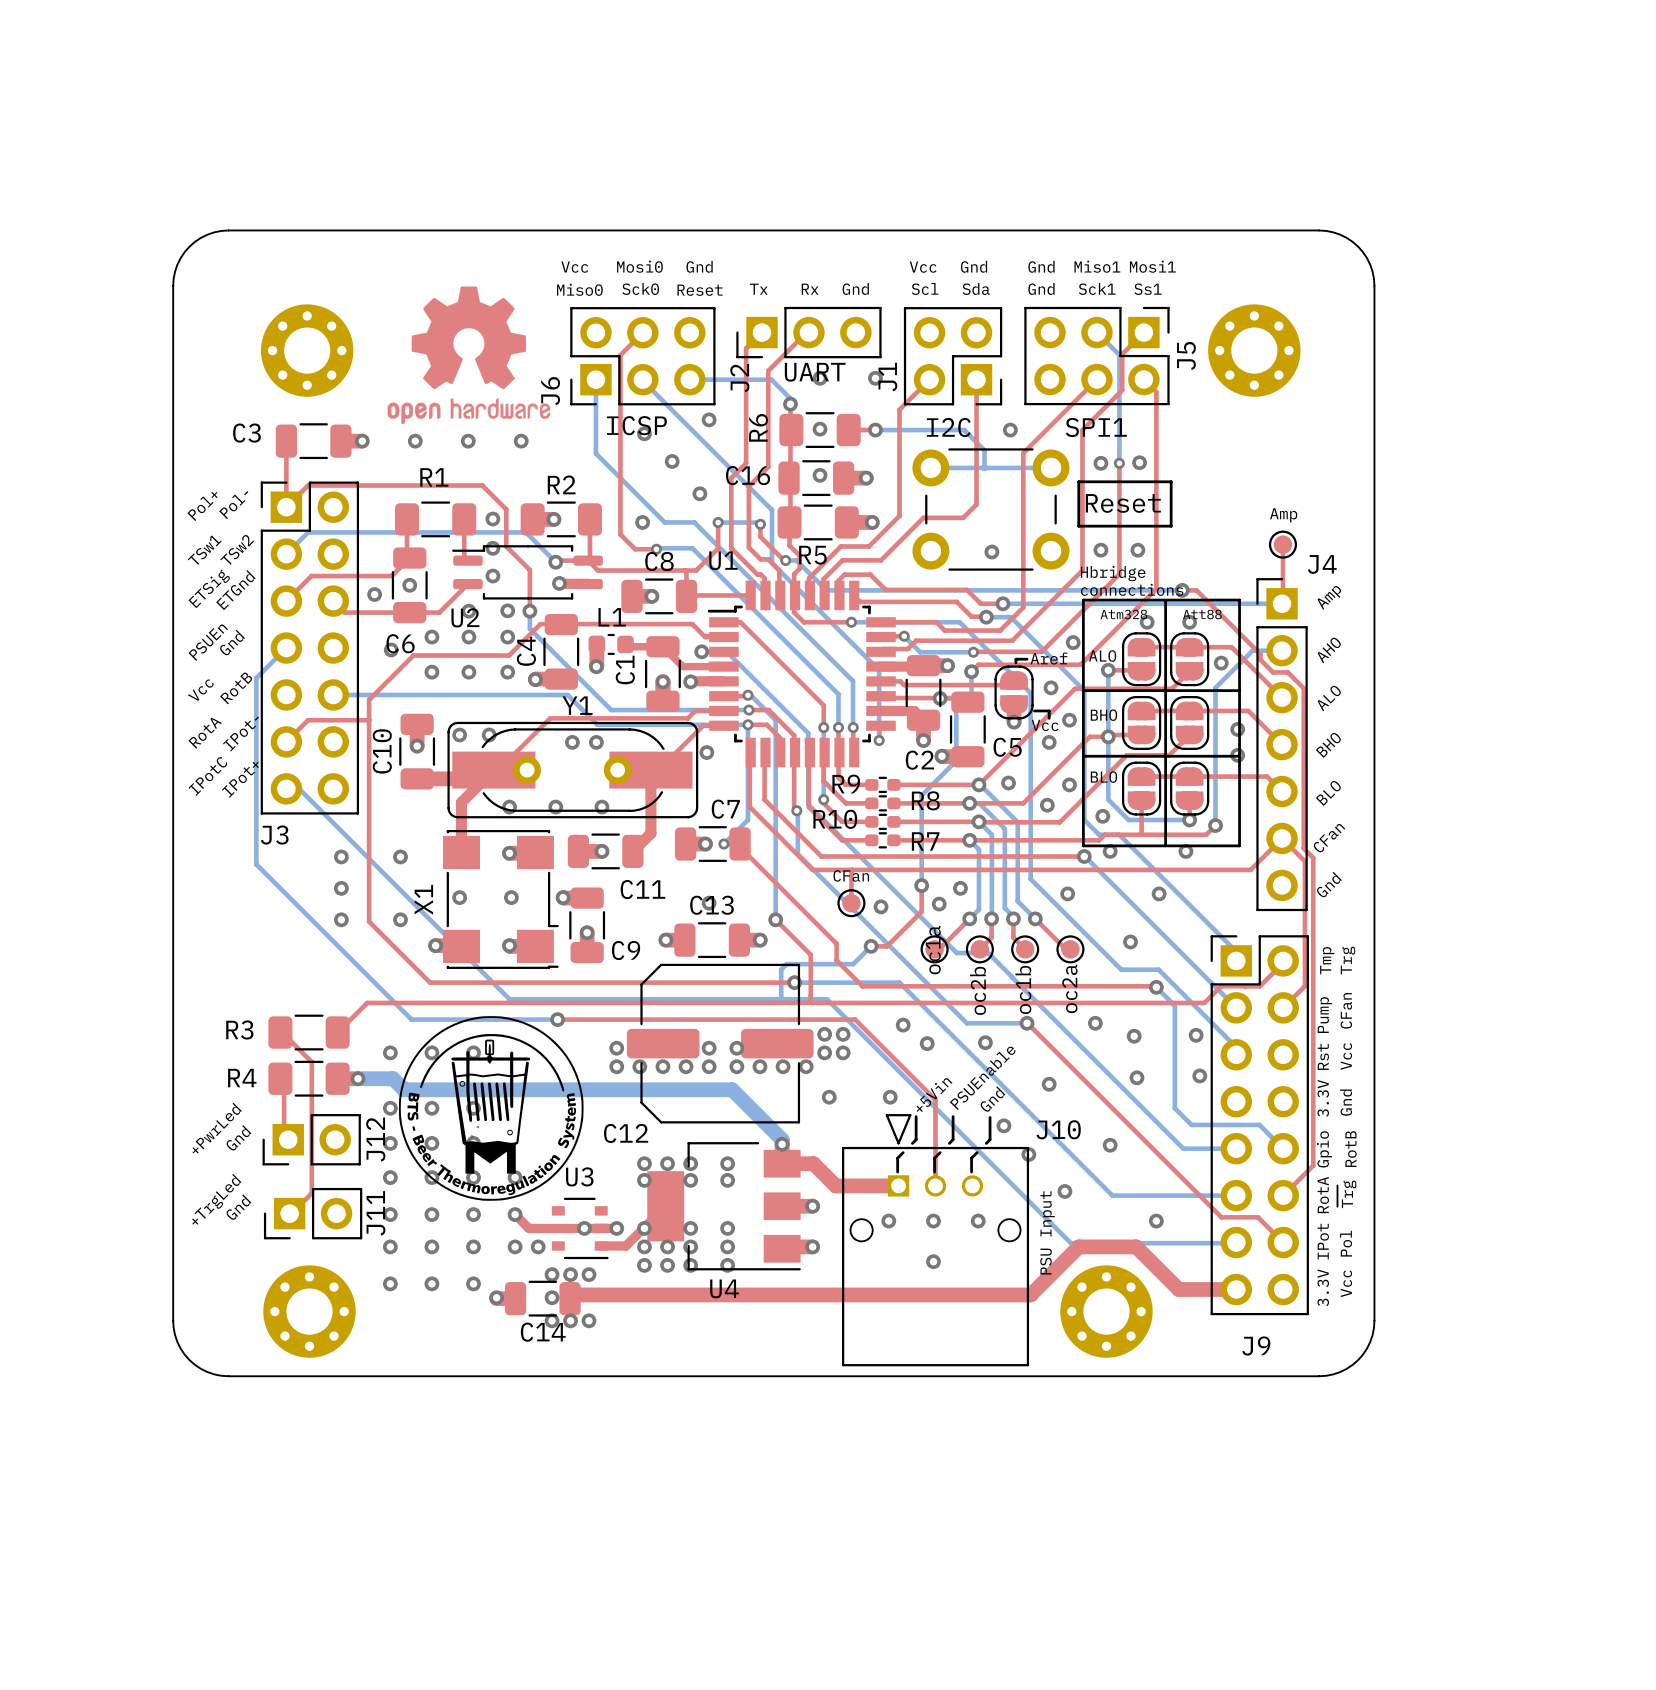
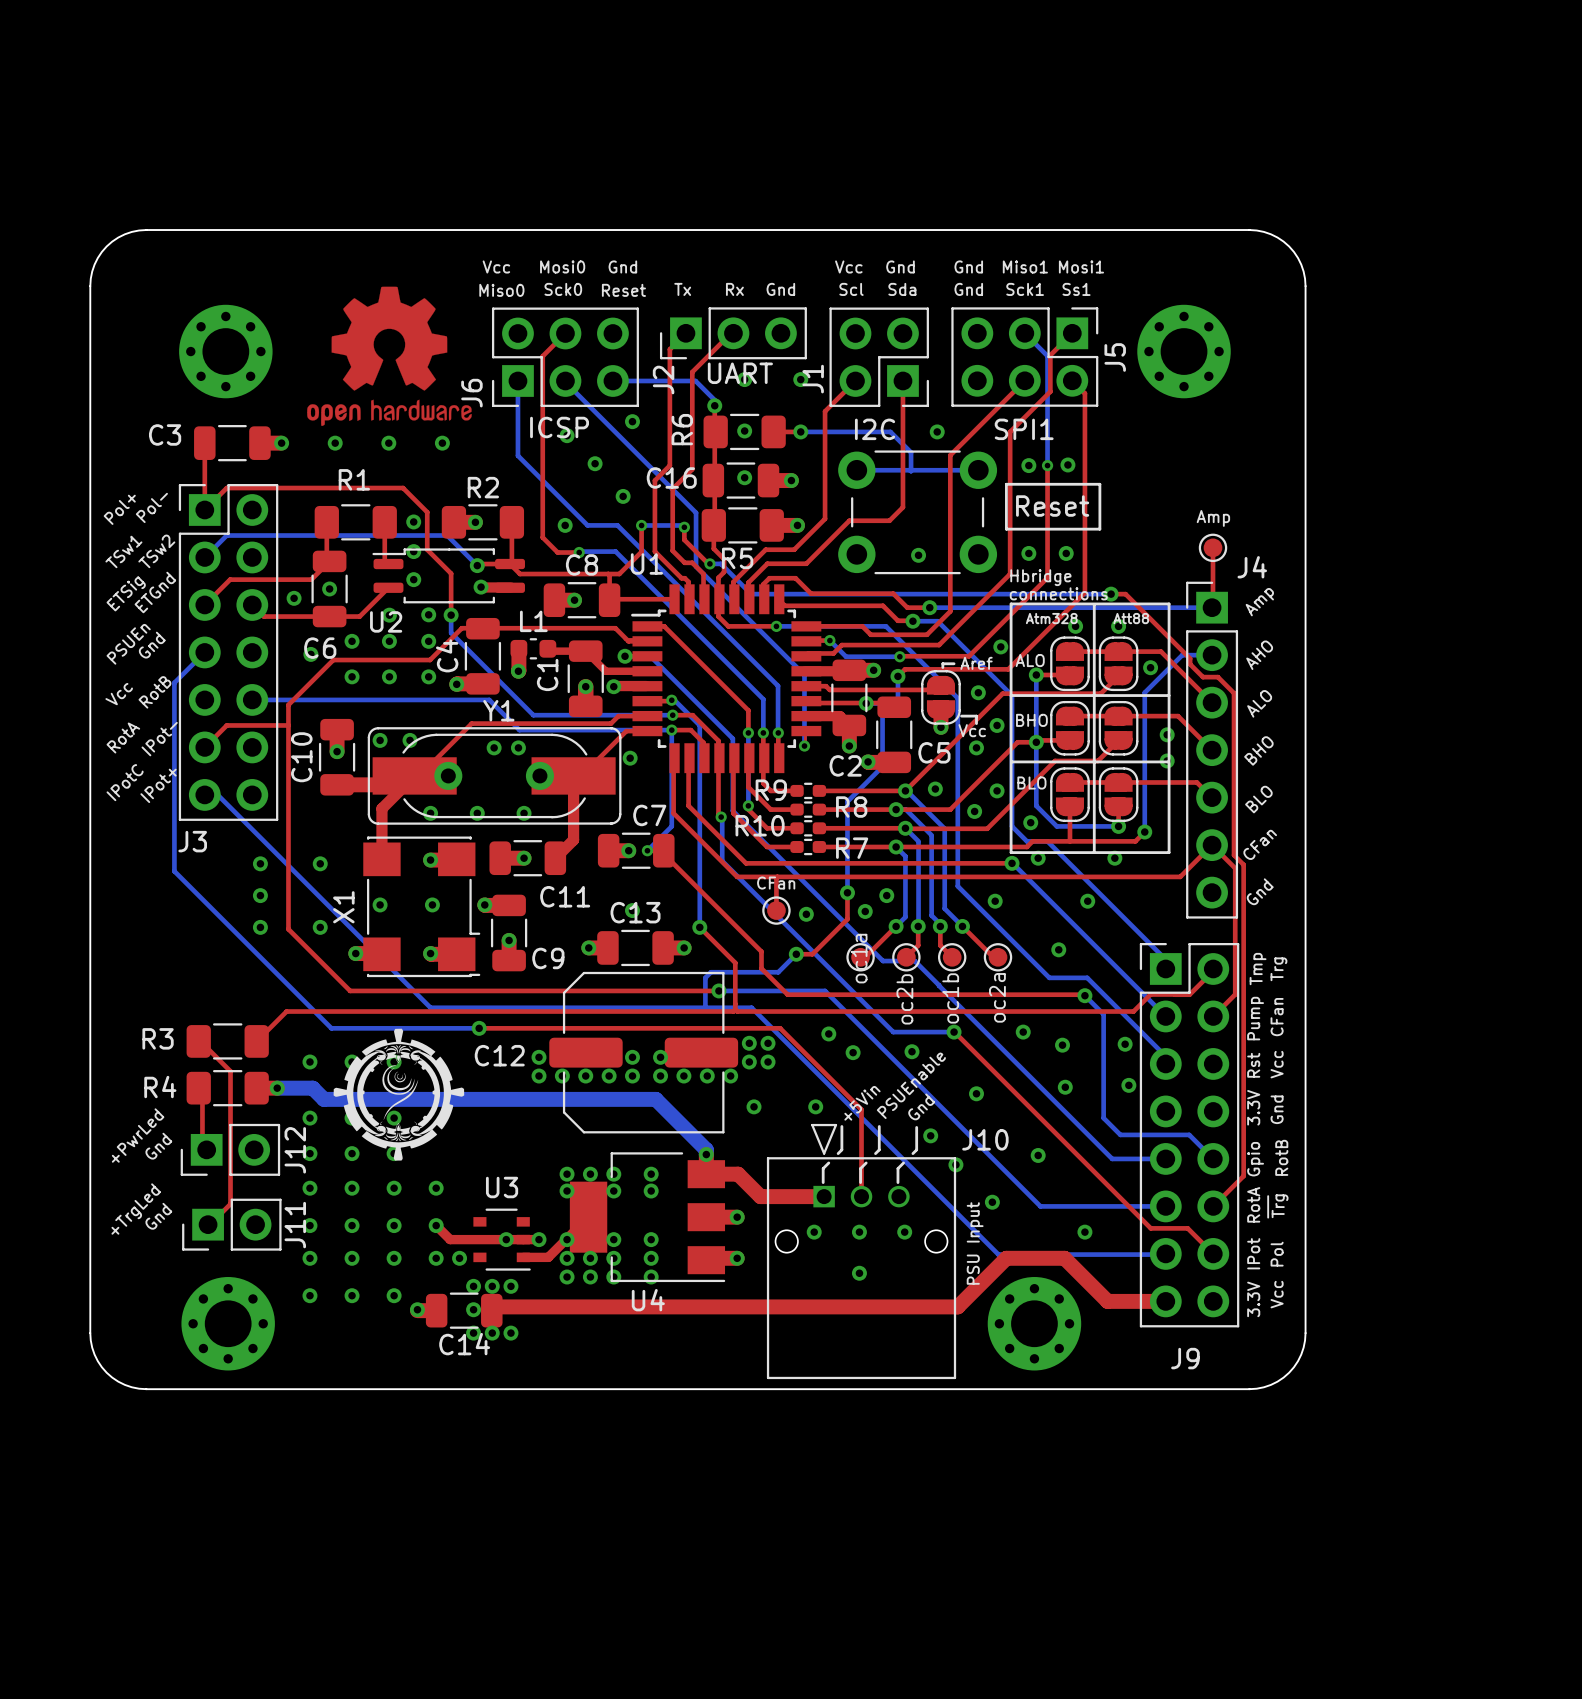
drawing: [398, 1016, 584, 1201] -> none
drawing: none -> [333, 1028, 465, 1161]
C12 name position: C12 (626, 1133) -> C12 (499, 1055)

